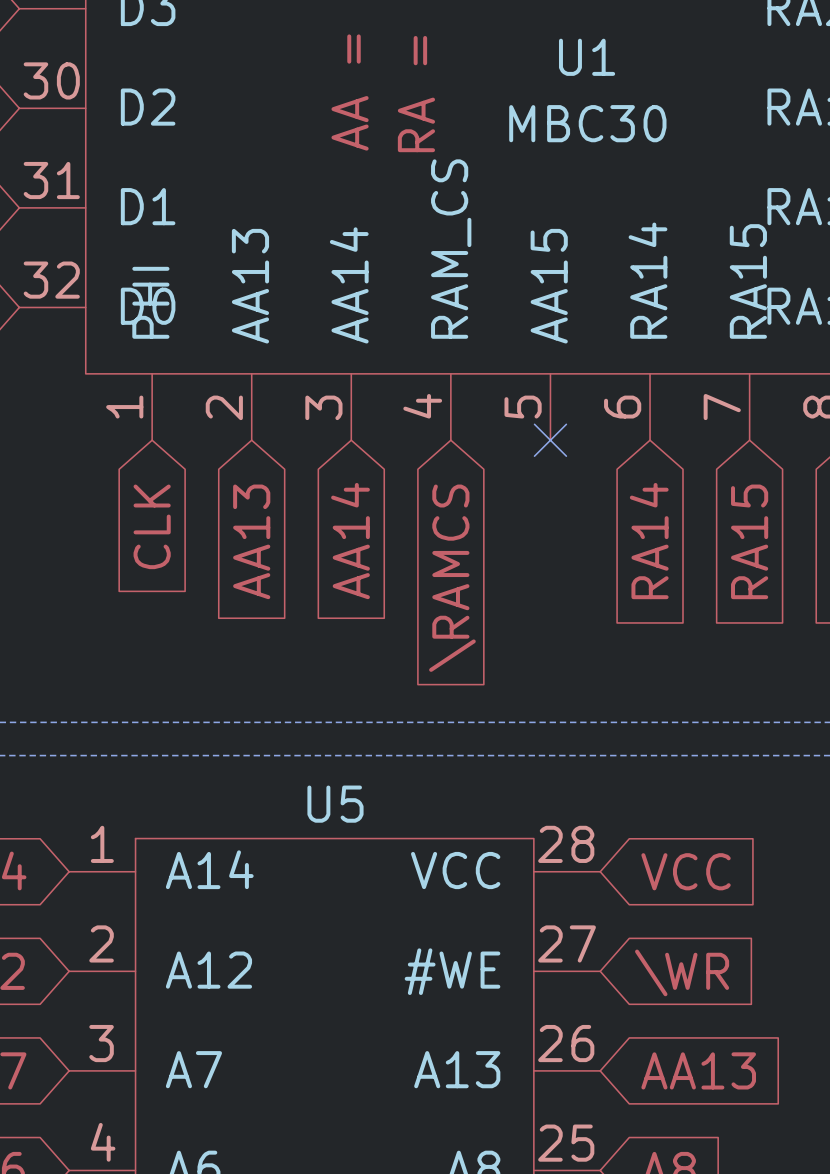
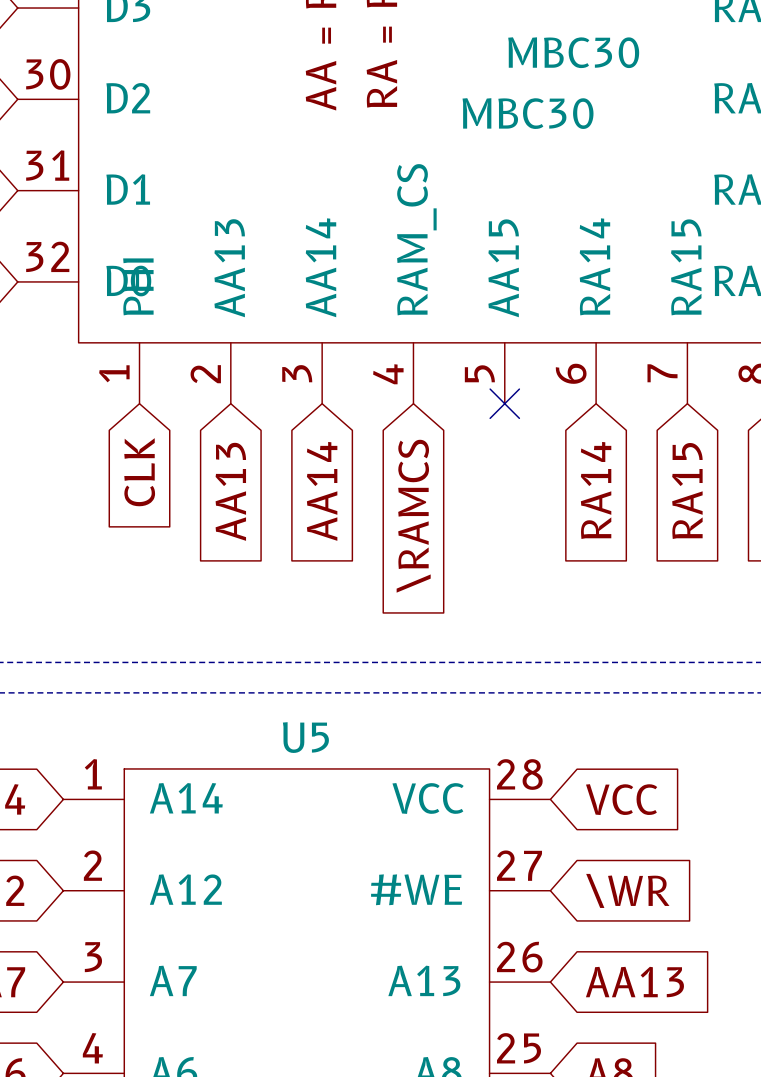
U1 name: U1 (587, 57) -> MBC30 (573, 52)

